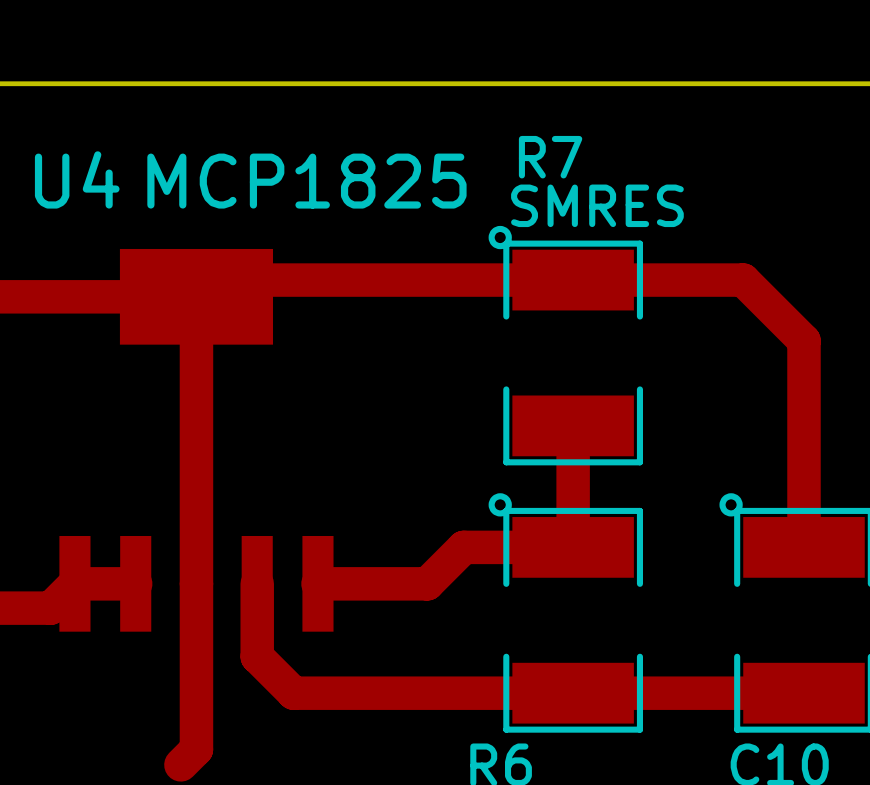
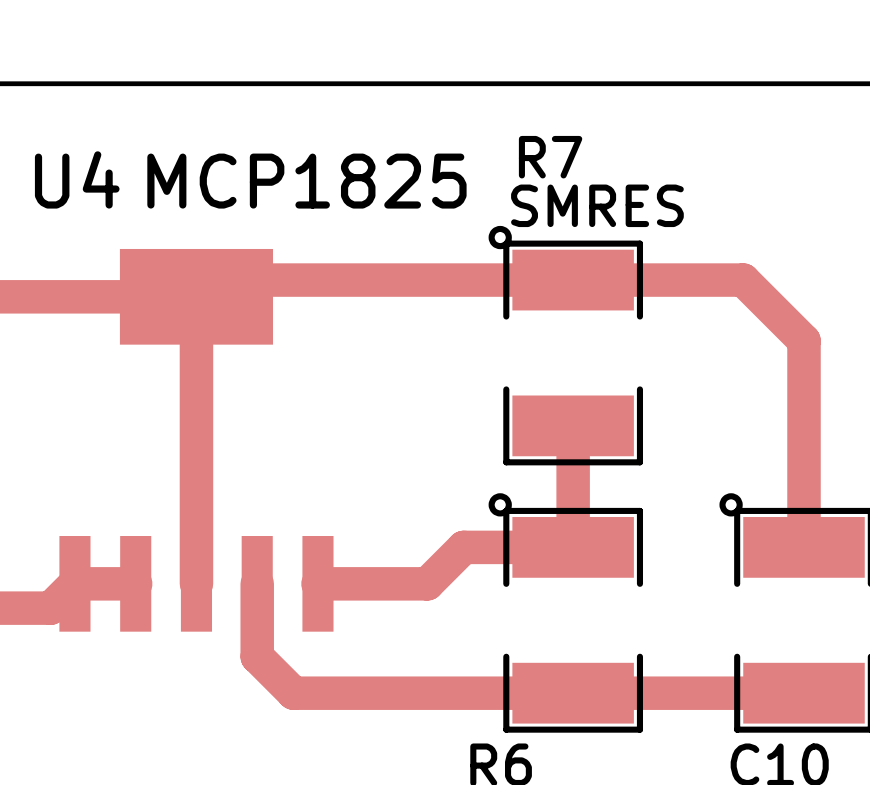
top track: (196, 583) (196, 749) (180, 764) -> none

